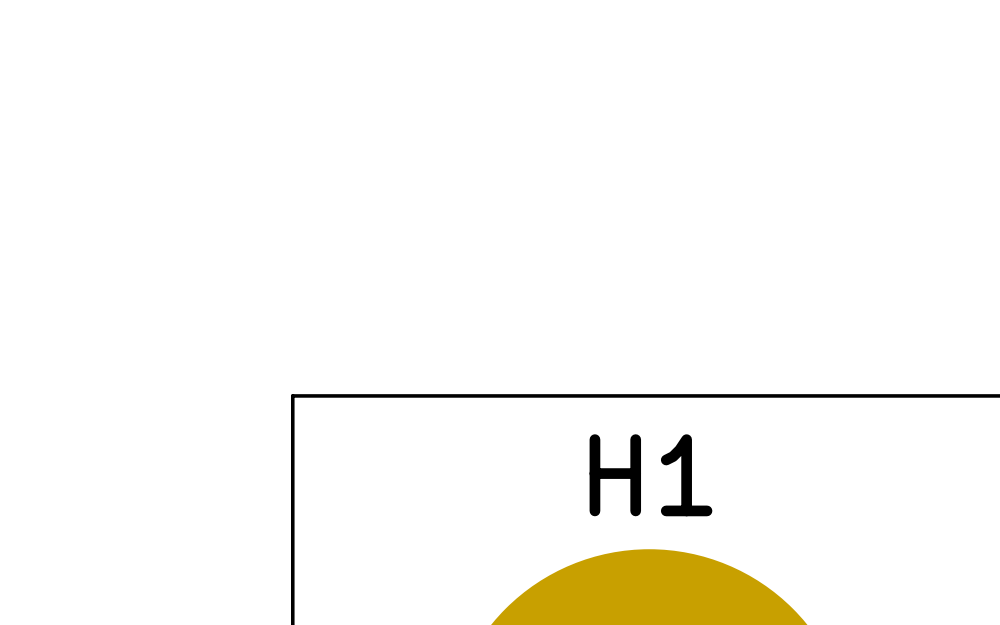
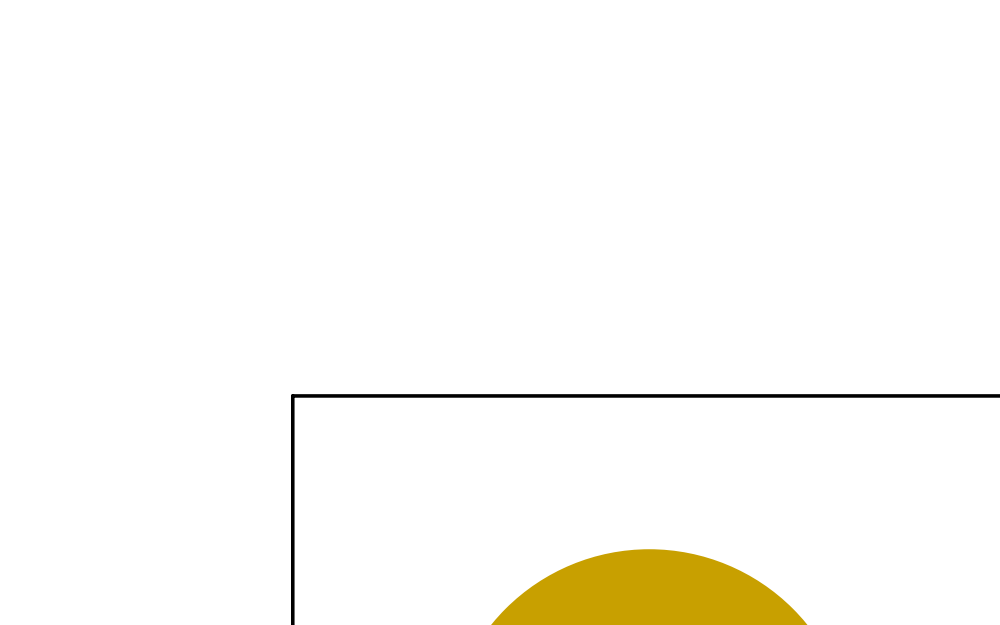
H1 name: H1 (650, 475) -> none

